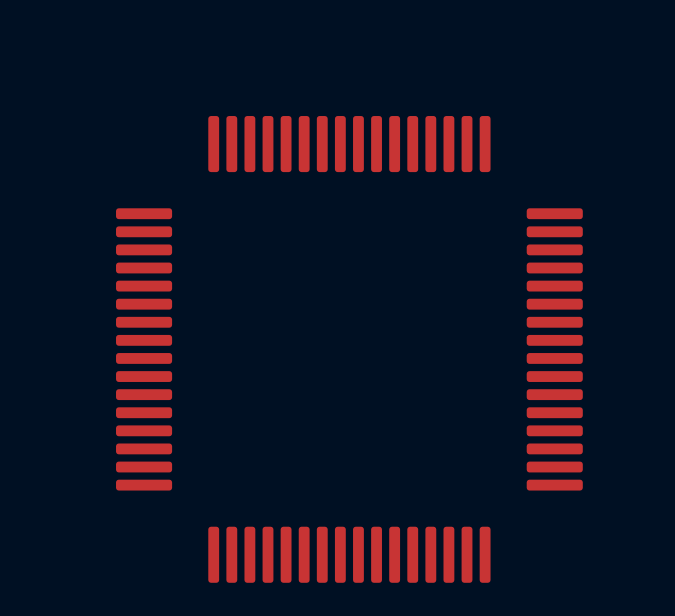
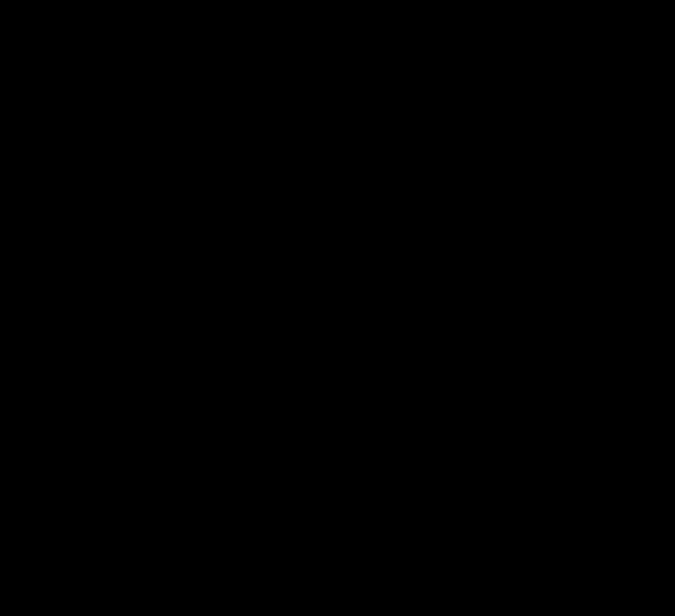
part: (349, 349) -> none

